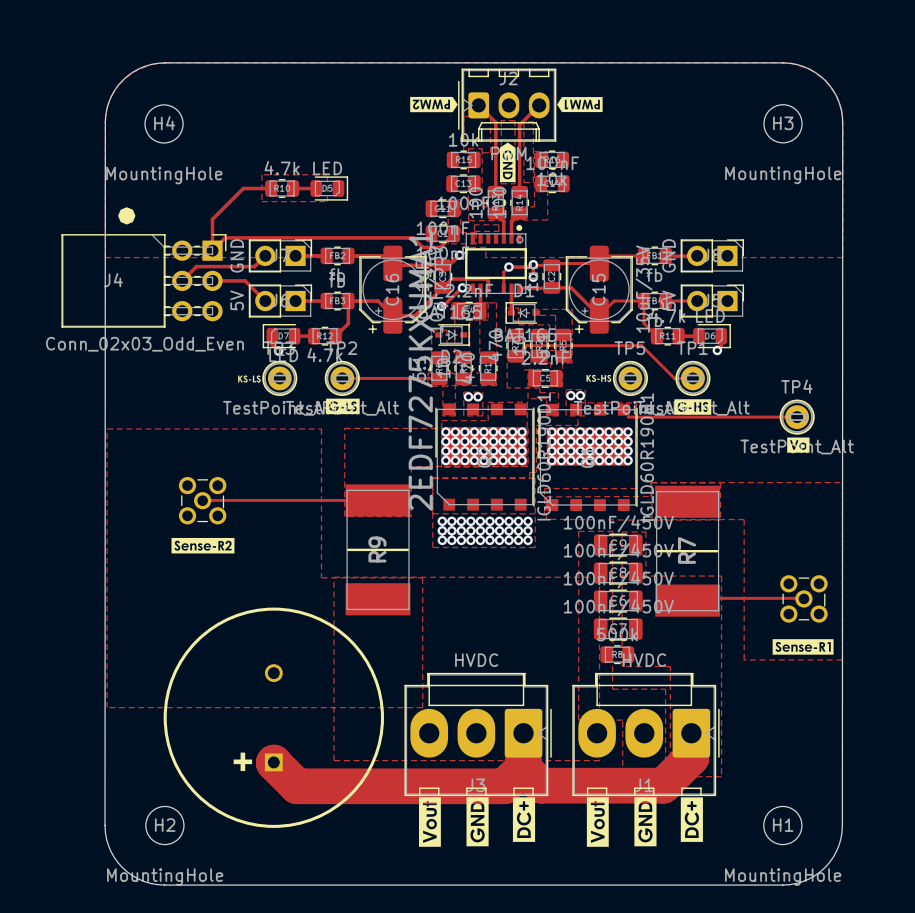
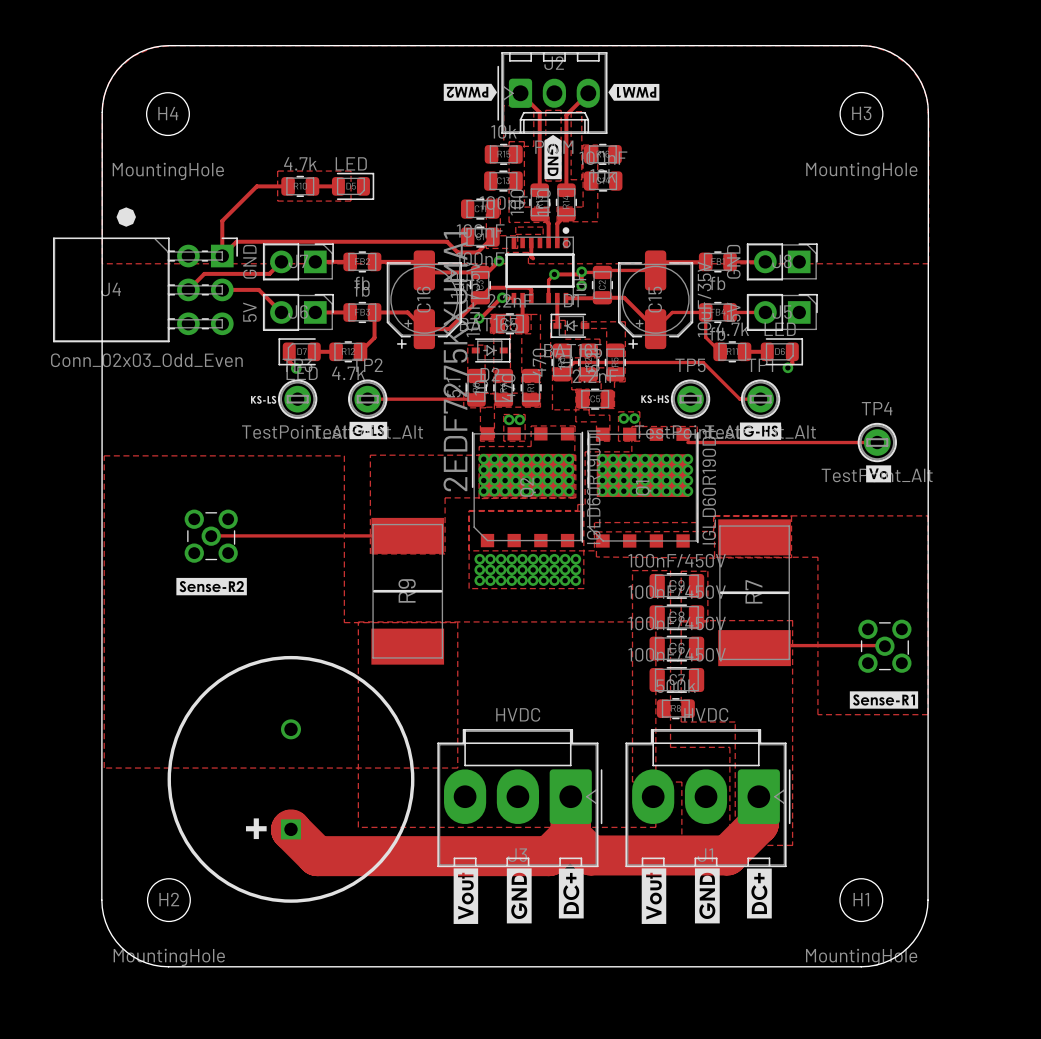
track: none -> (531, 242) (531, 256) (533, 258)

